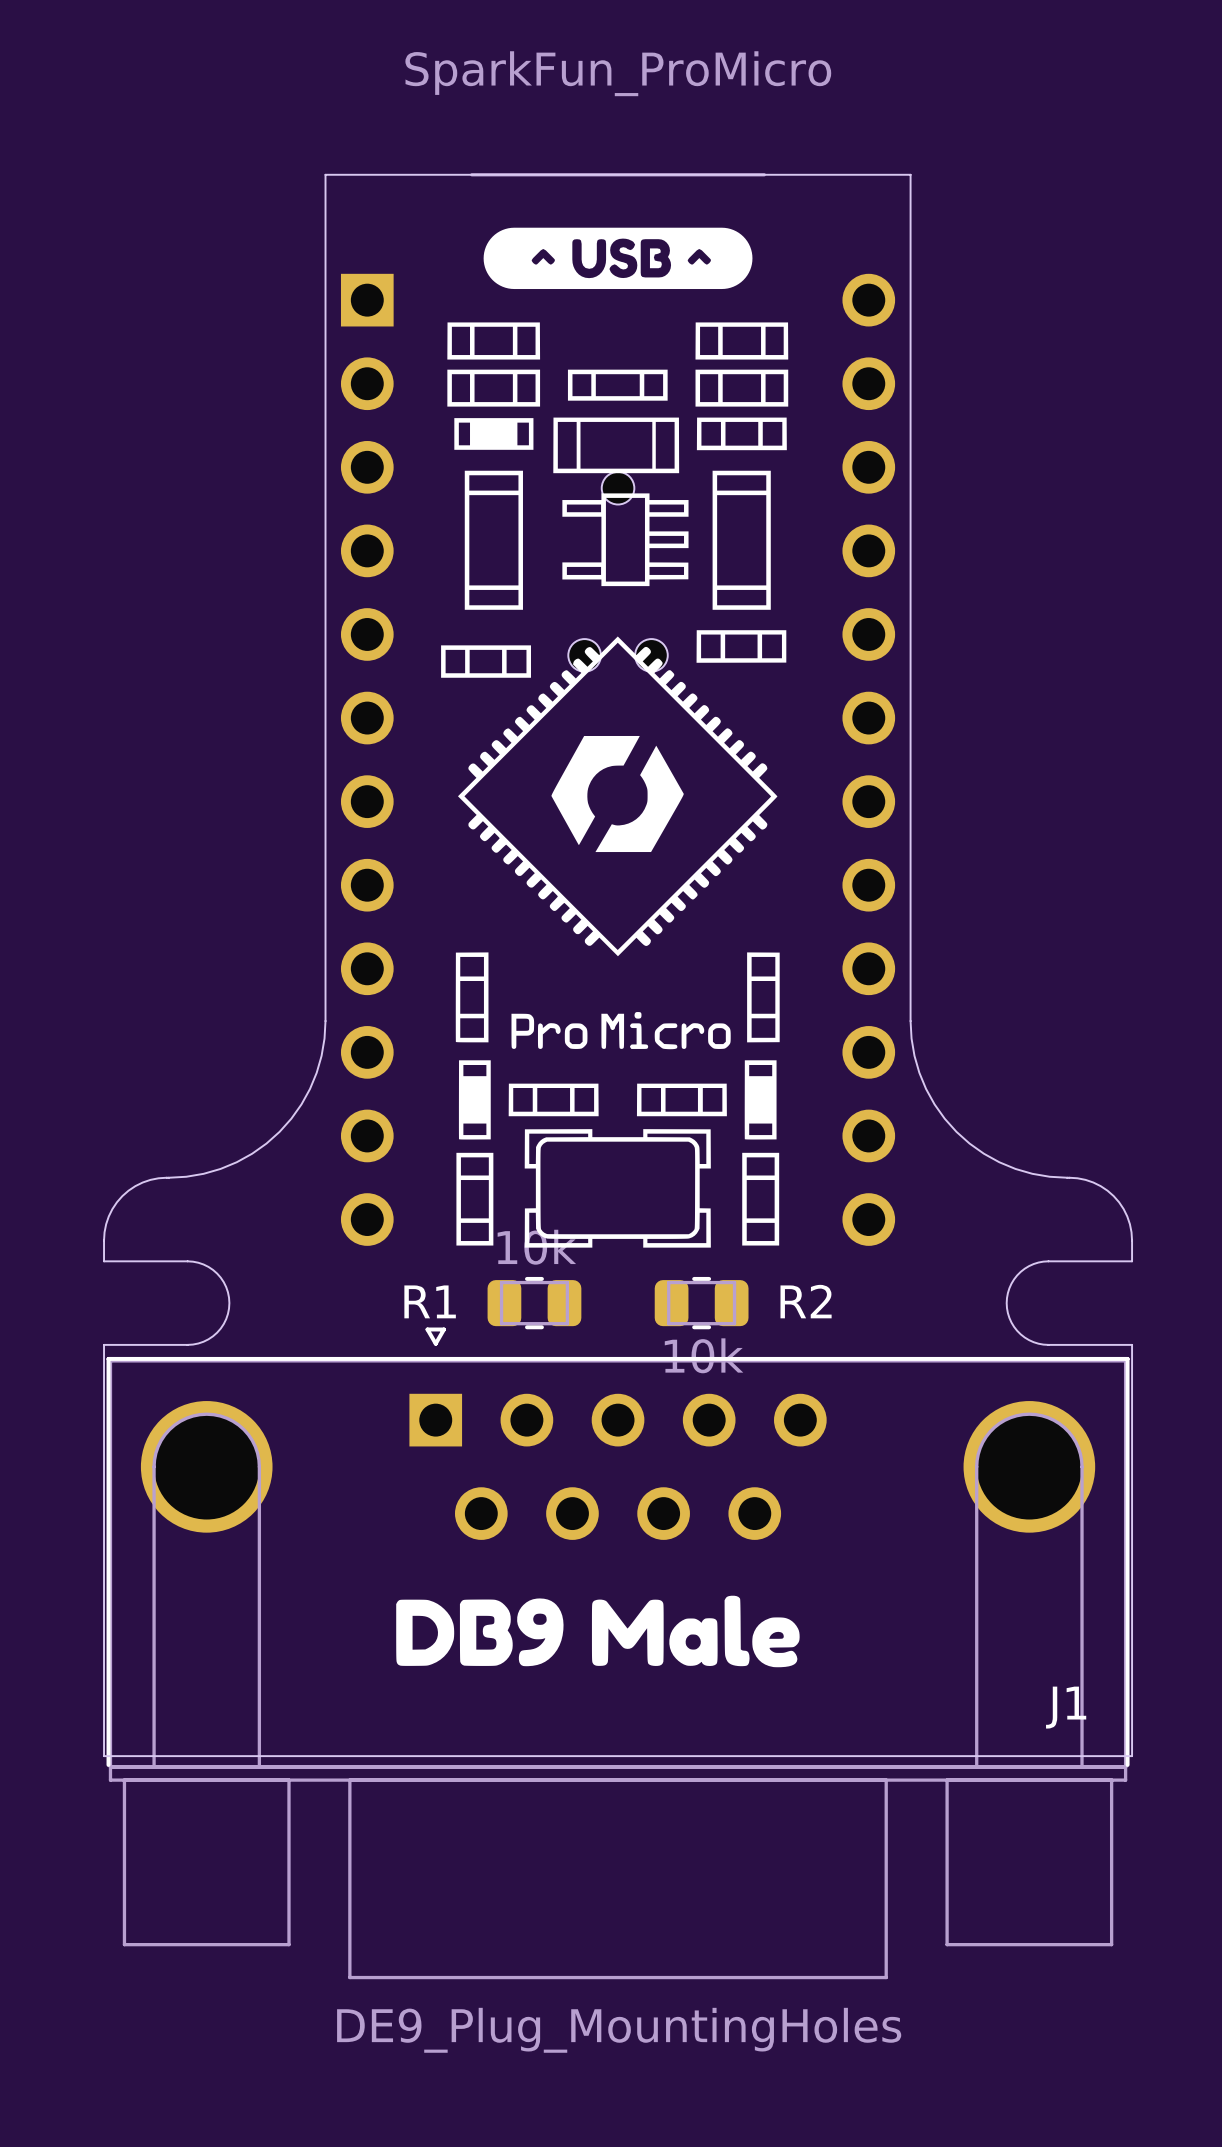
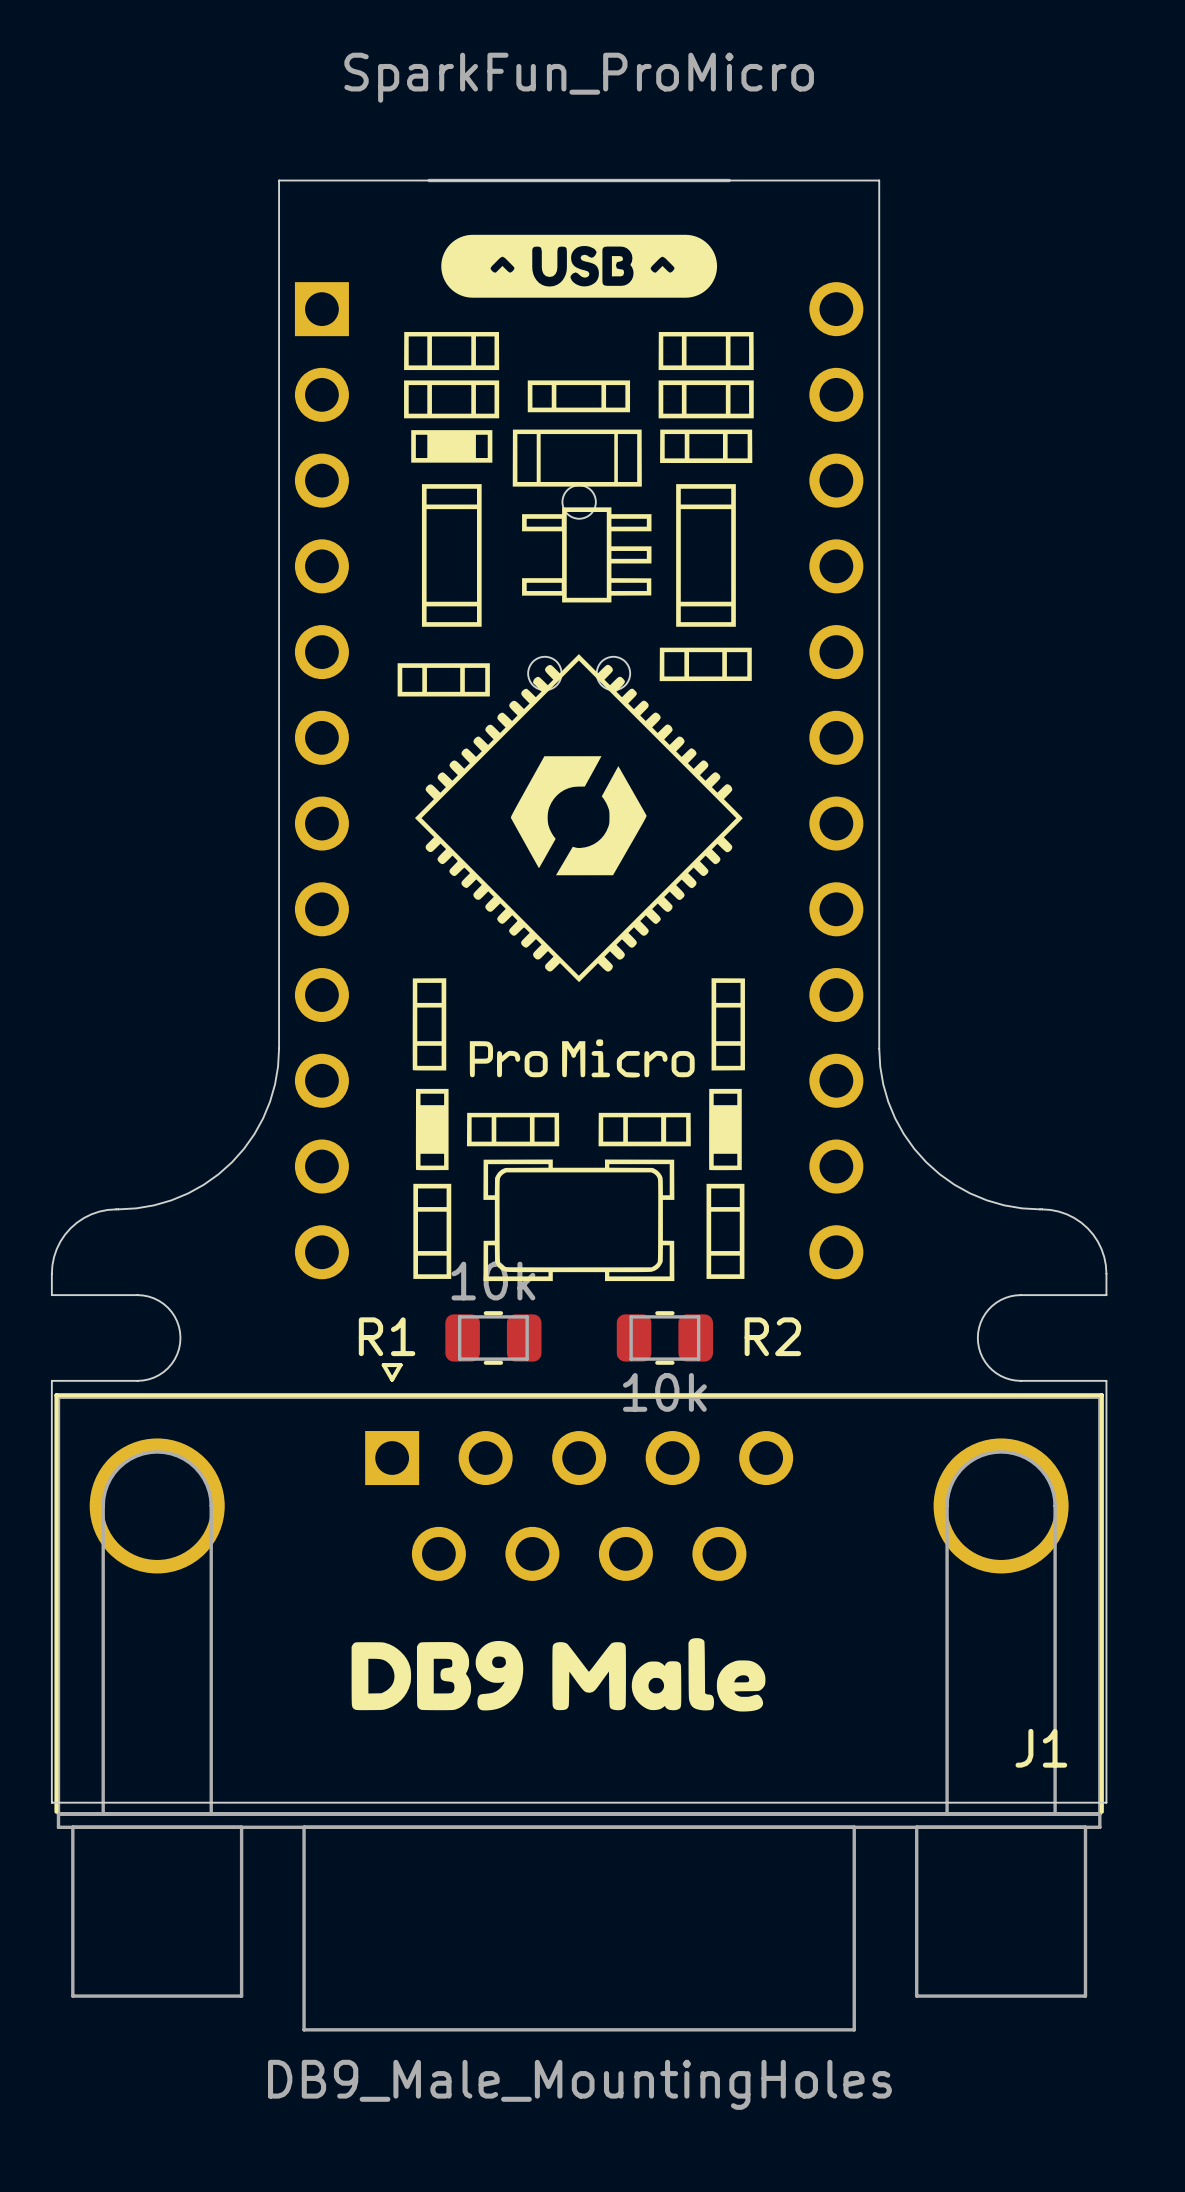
J1 value: DE9_Plug_MountingHoles (619, 2030) -> DB9_Male_MountingHoles (579, 2084)

